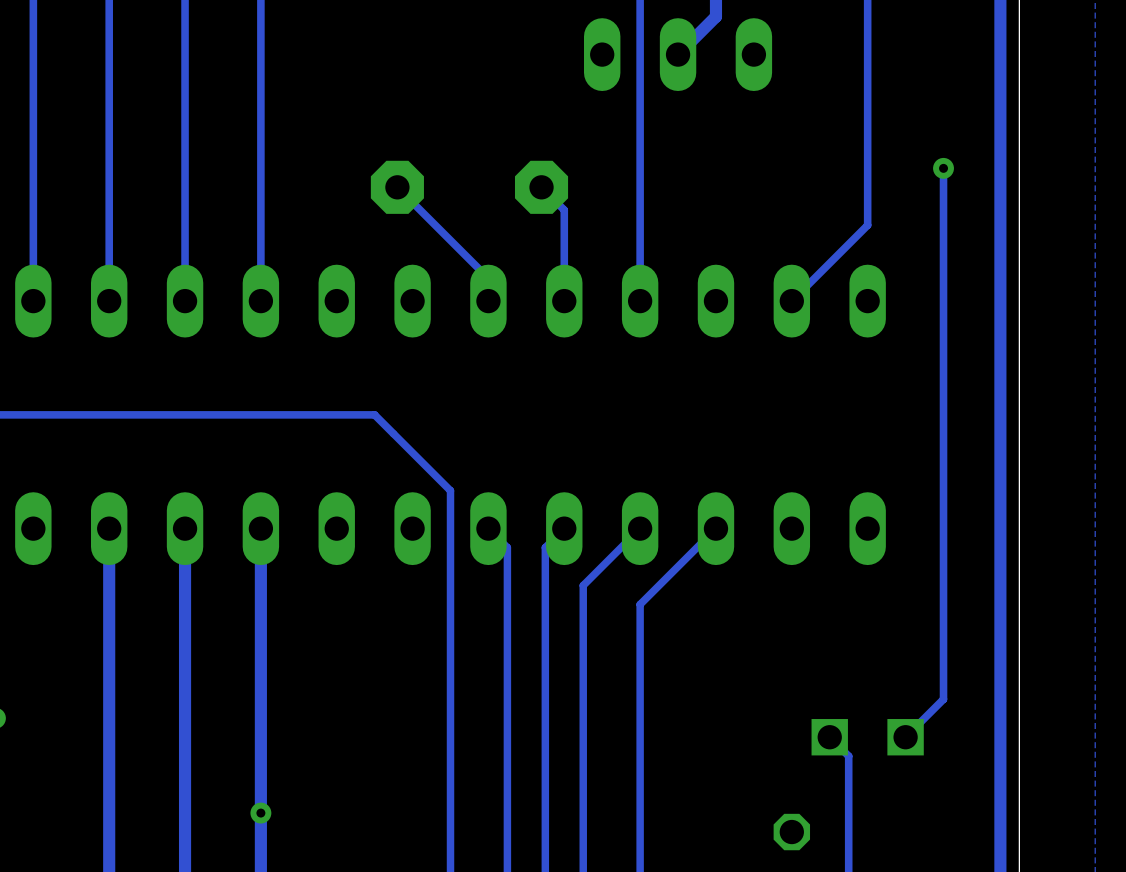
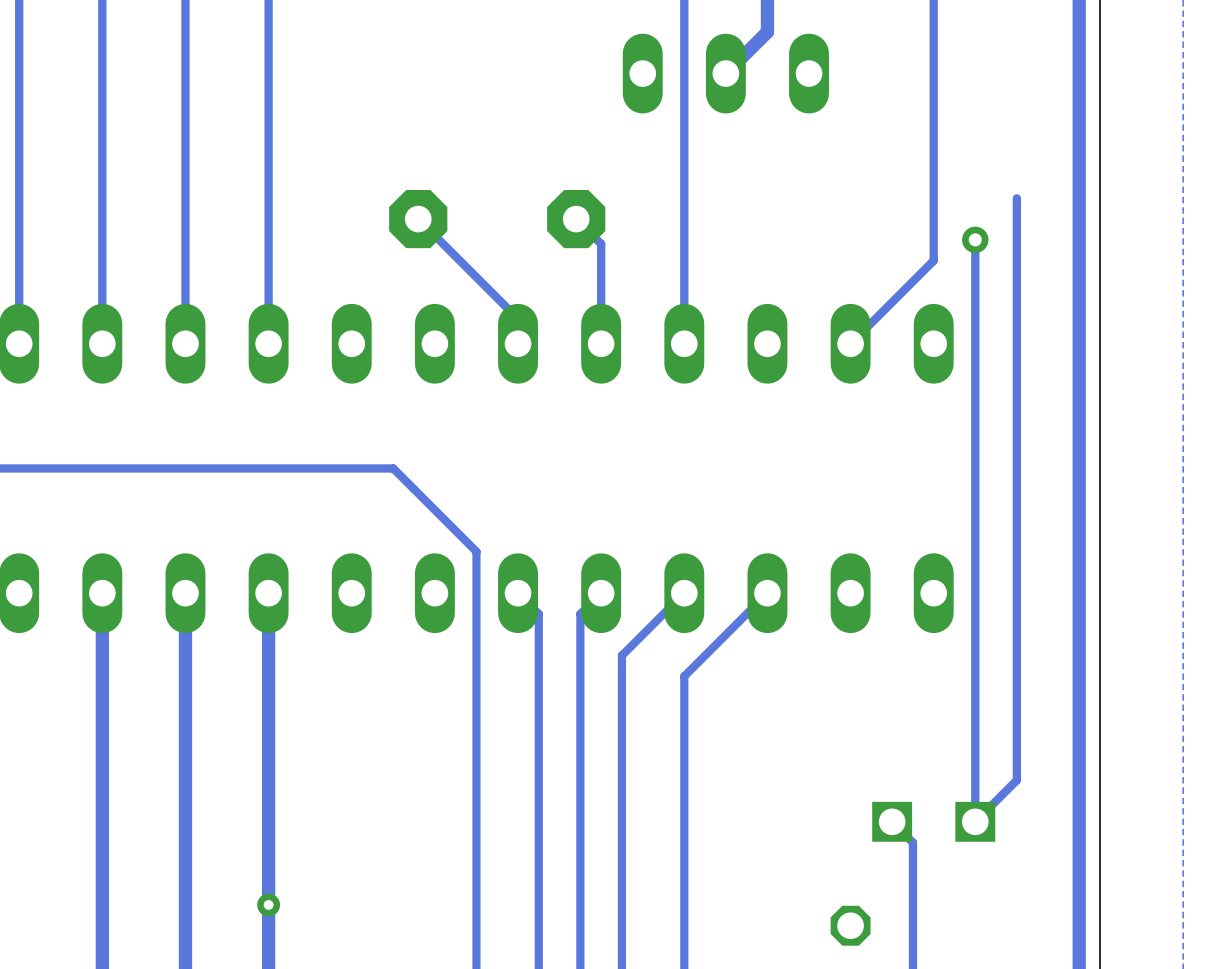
via: (943, 168) -> none
track: none -> (975, 239) (975, 821)
via: none -> (975, 239)

